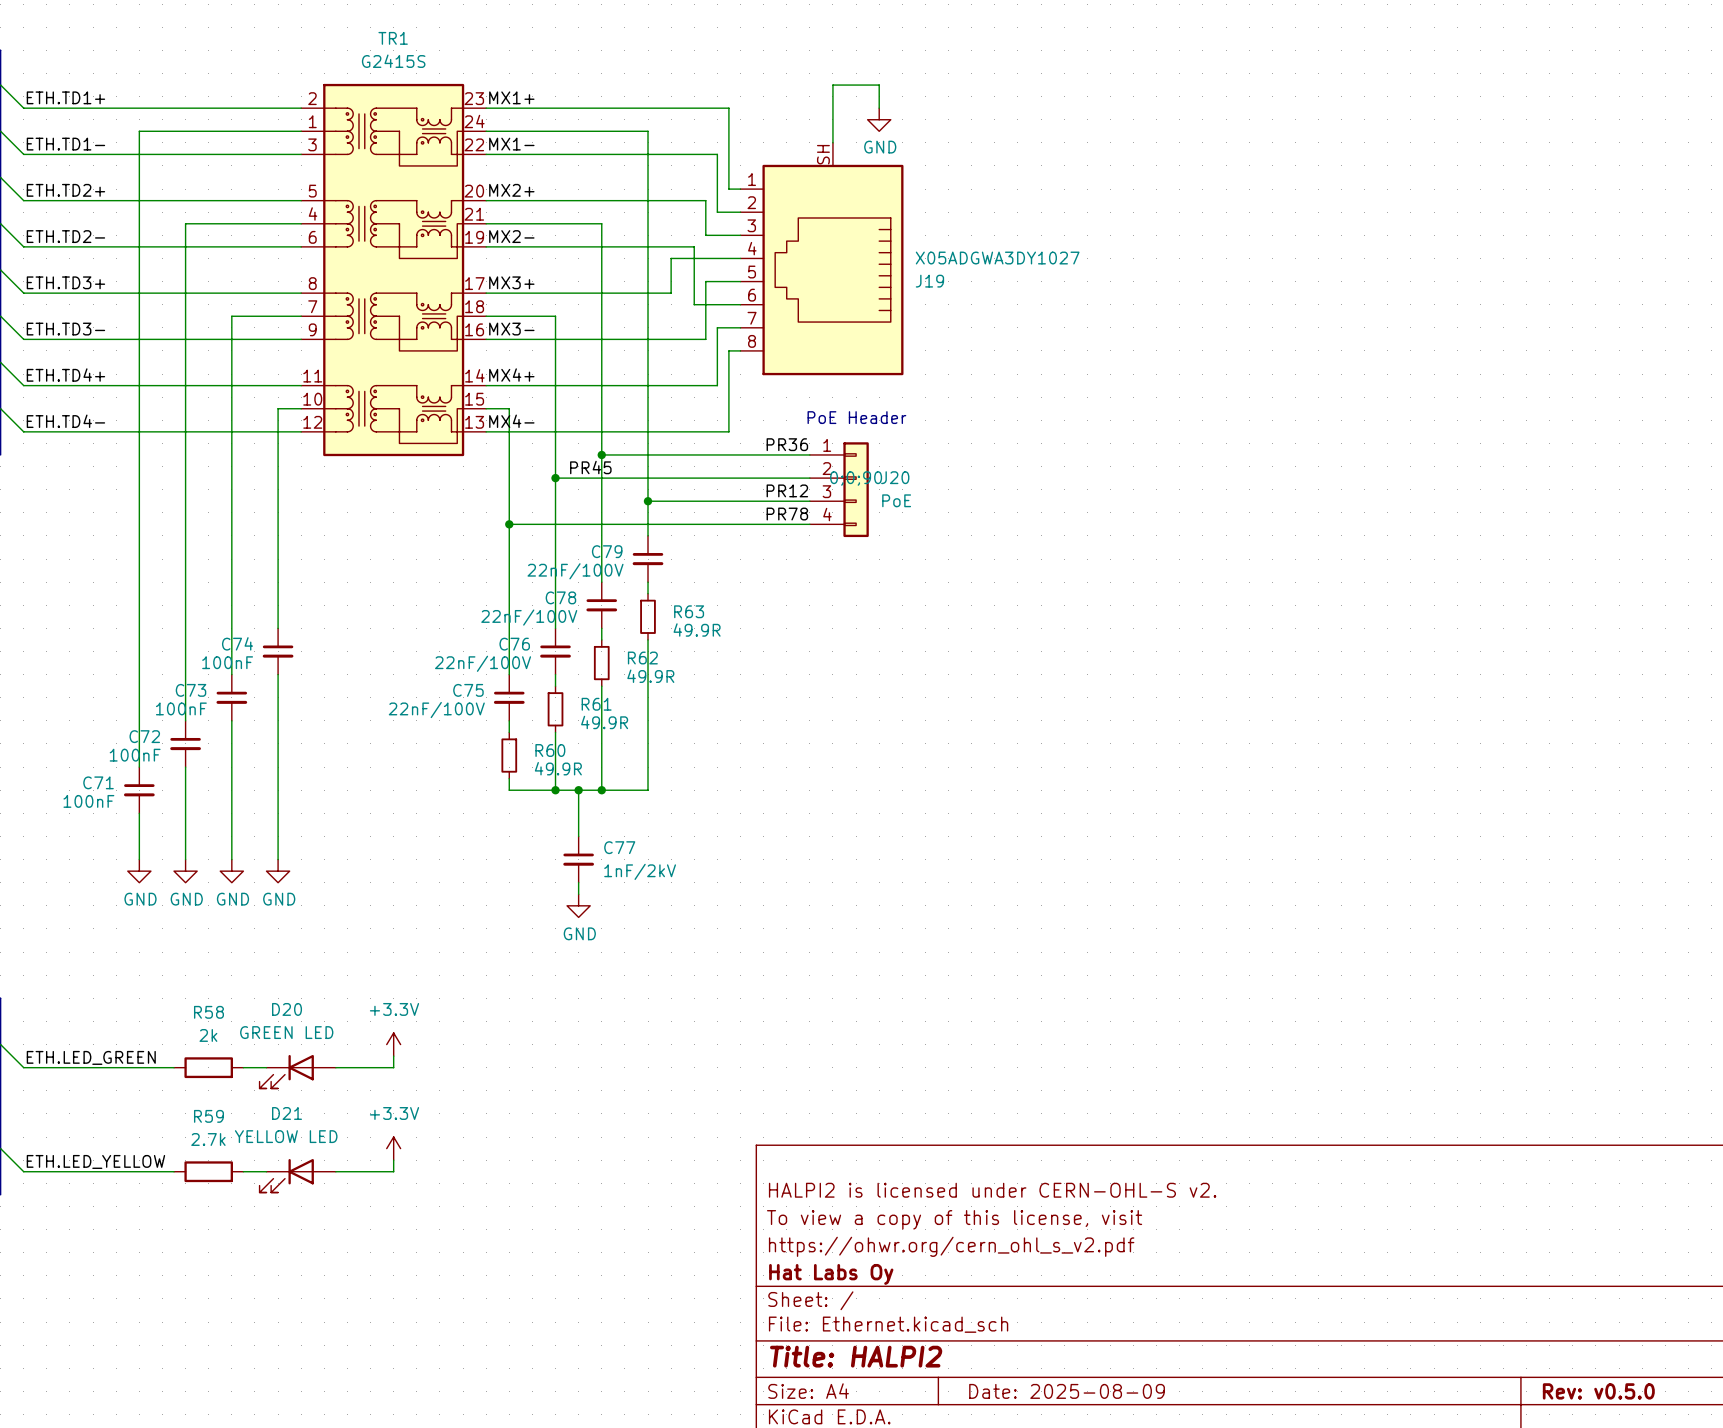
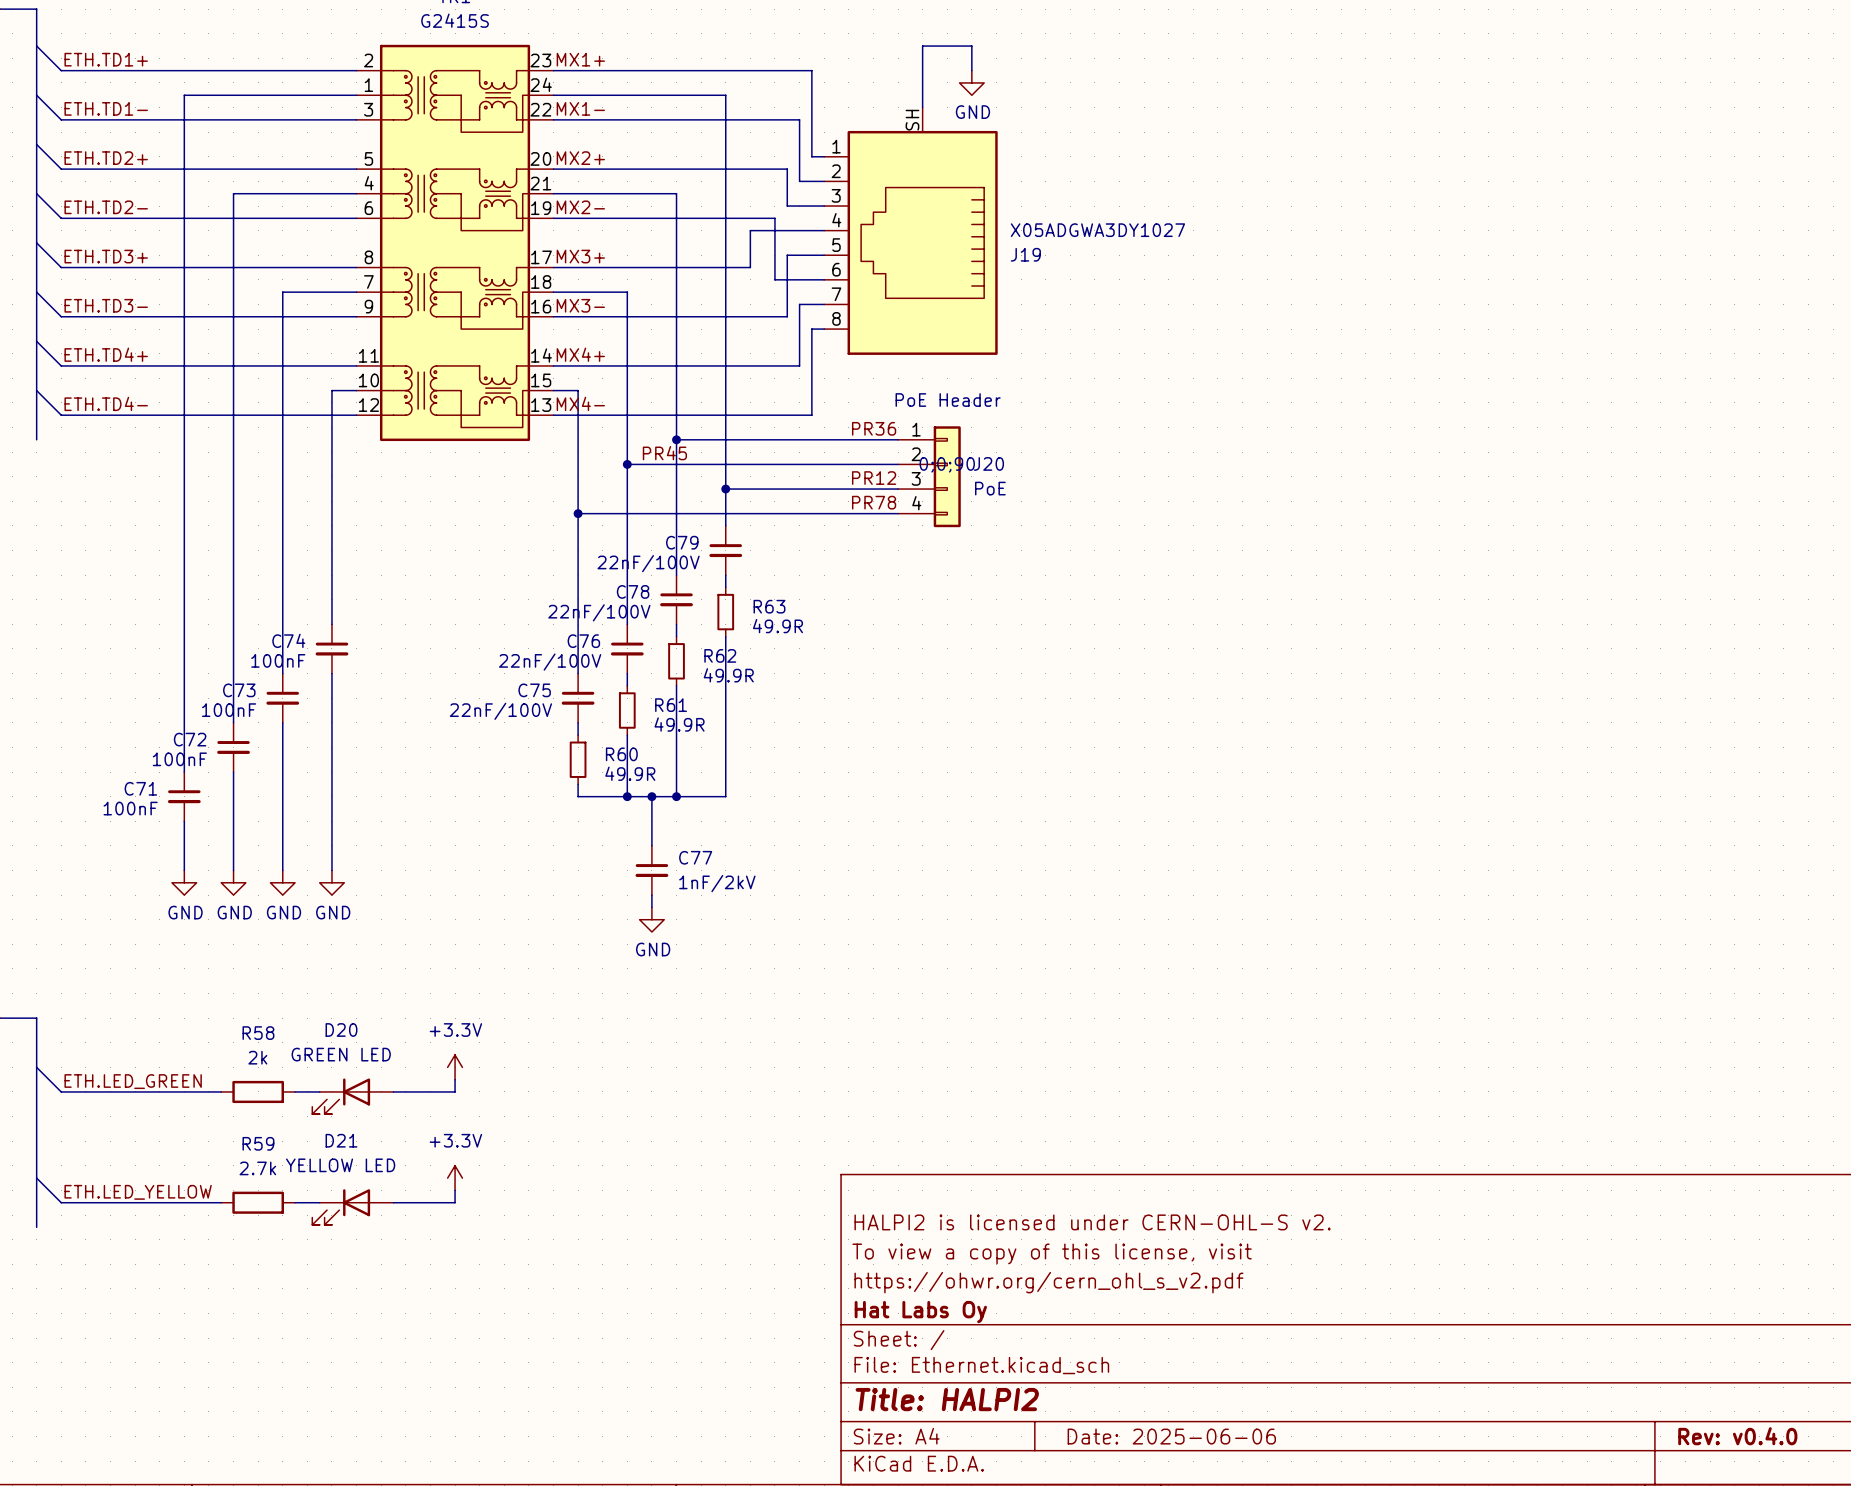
title block: Date: 2025-08-09 (1067, 1391) -> Date: 2025-06-06 (1171, 1436)
title block: Rev: v0.5.0 (1598, 1391) -> Rev: v0.4.0 (1737, 1436)

